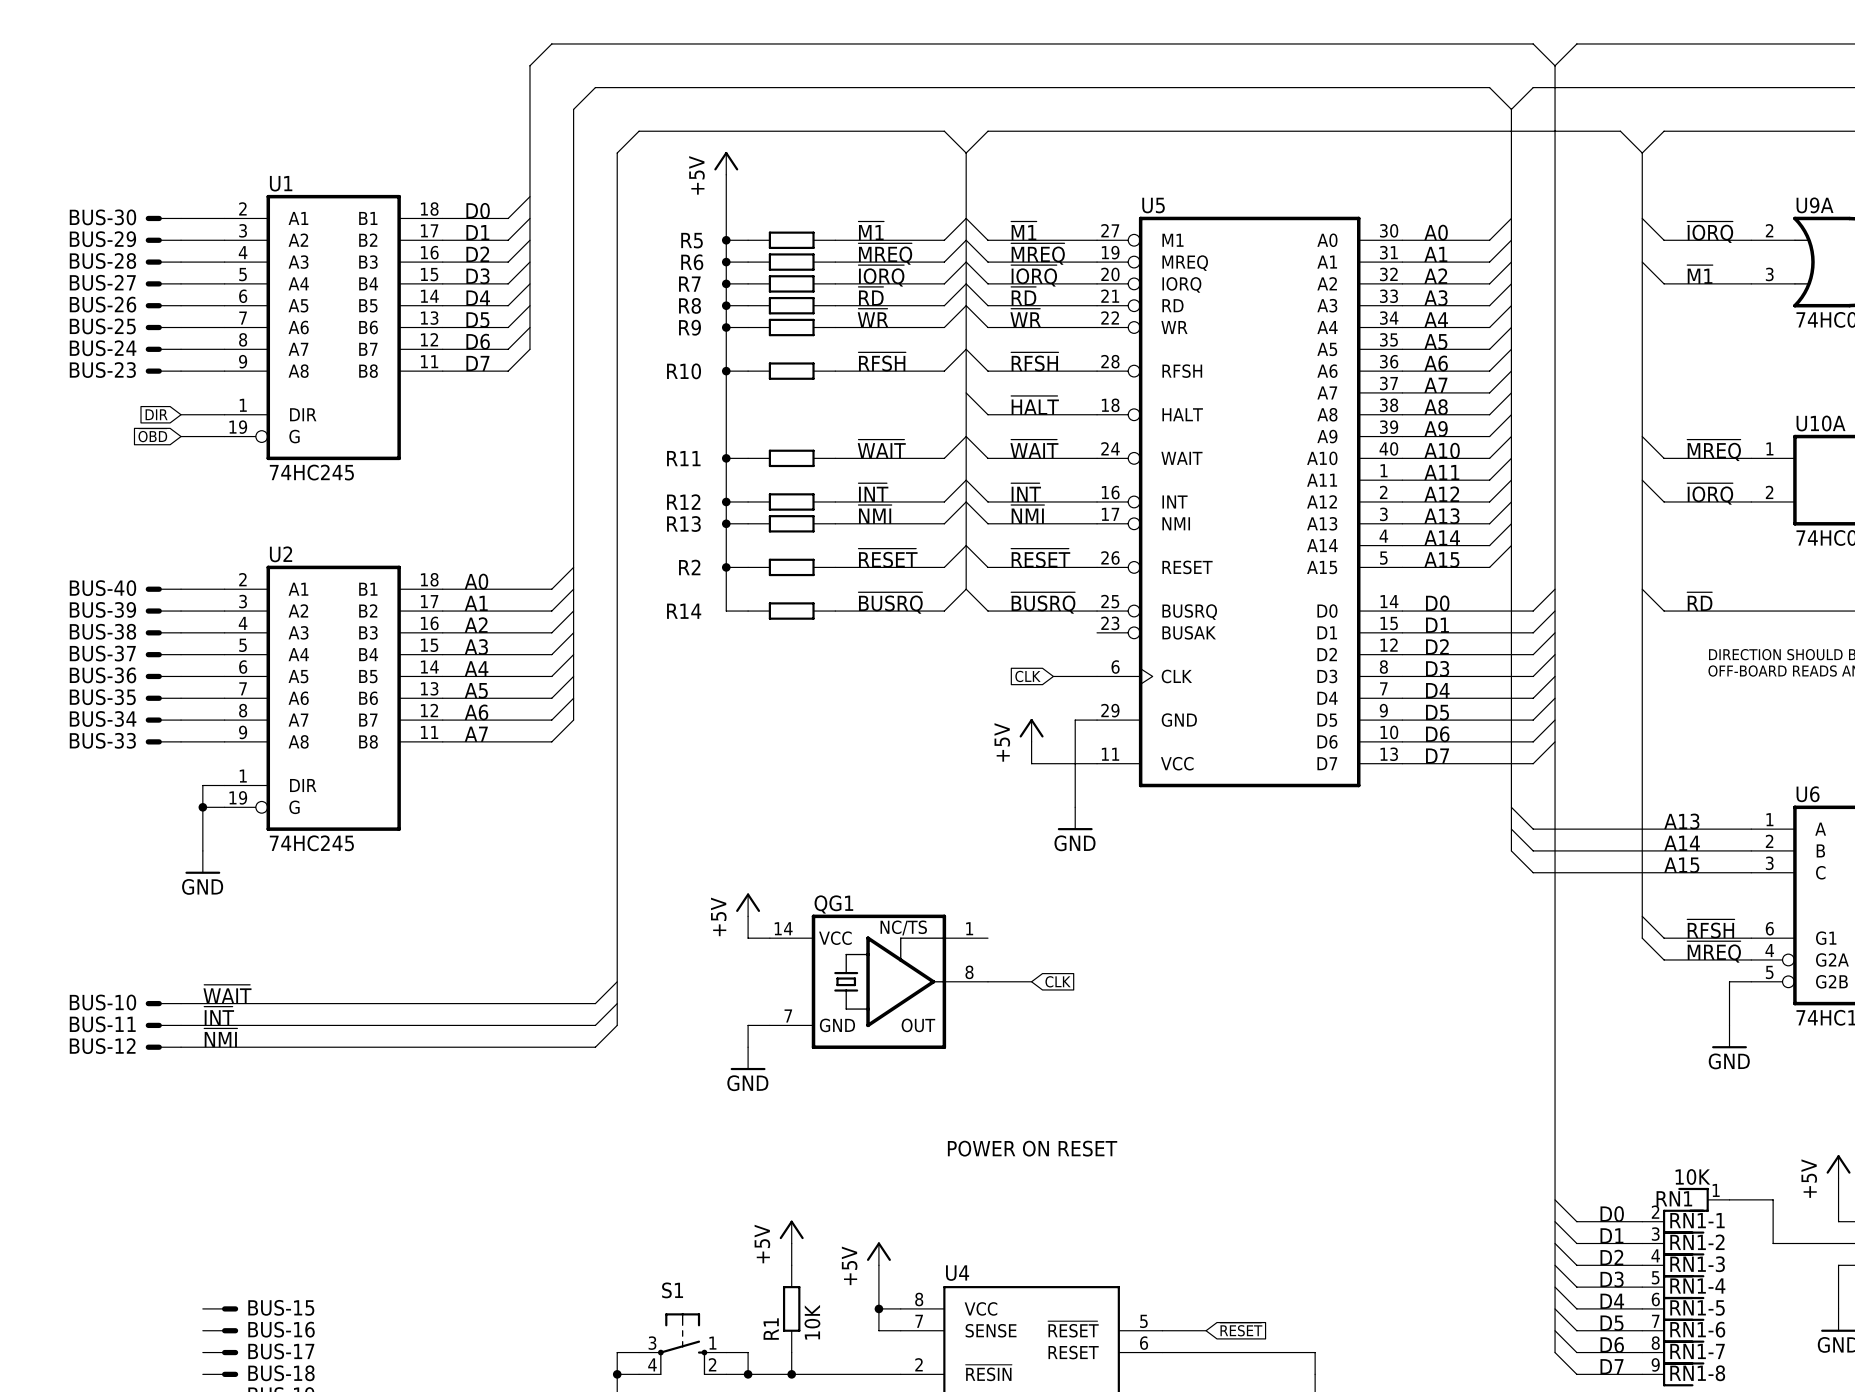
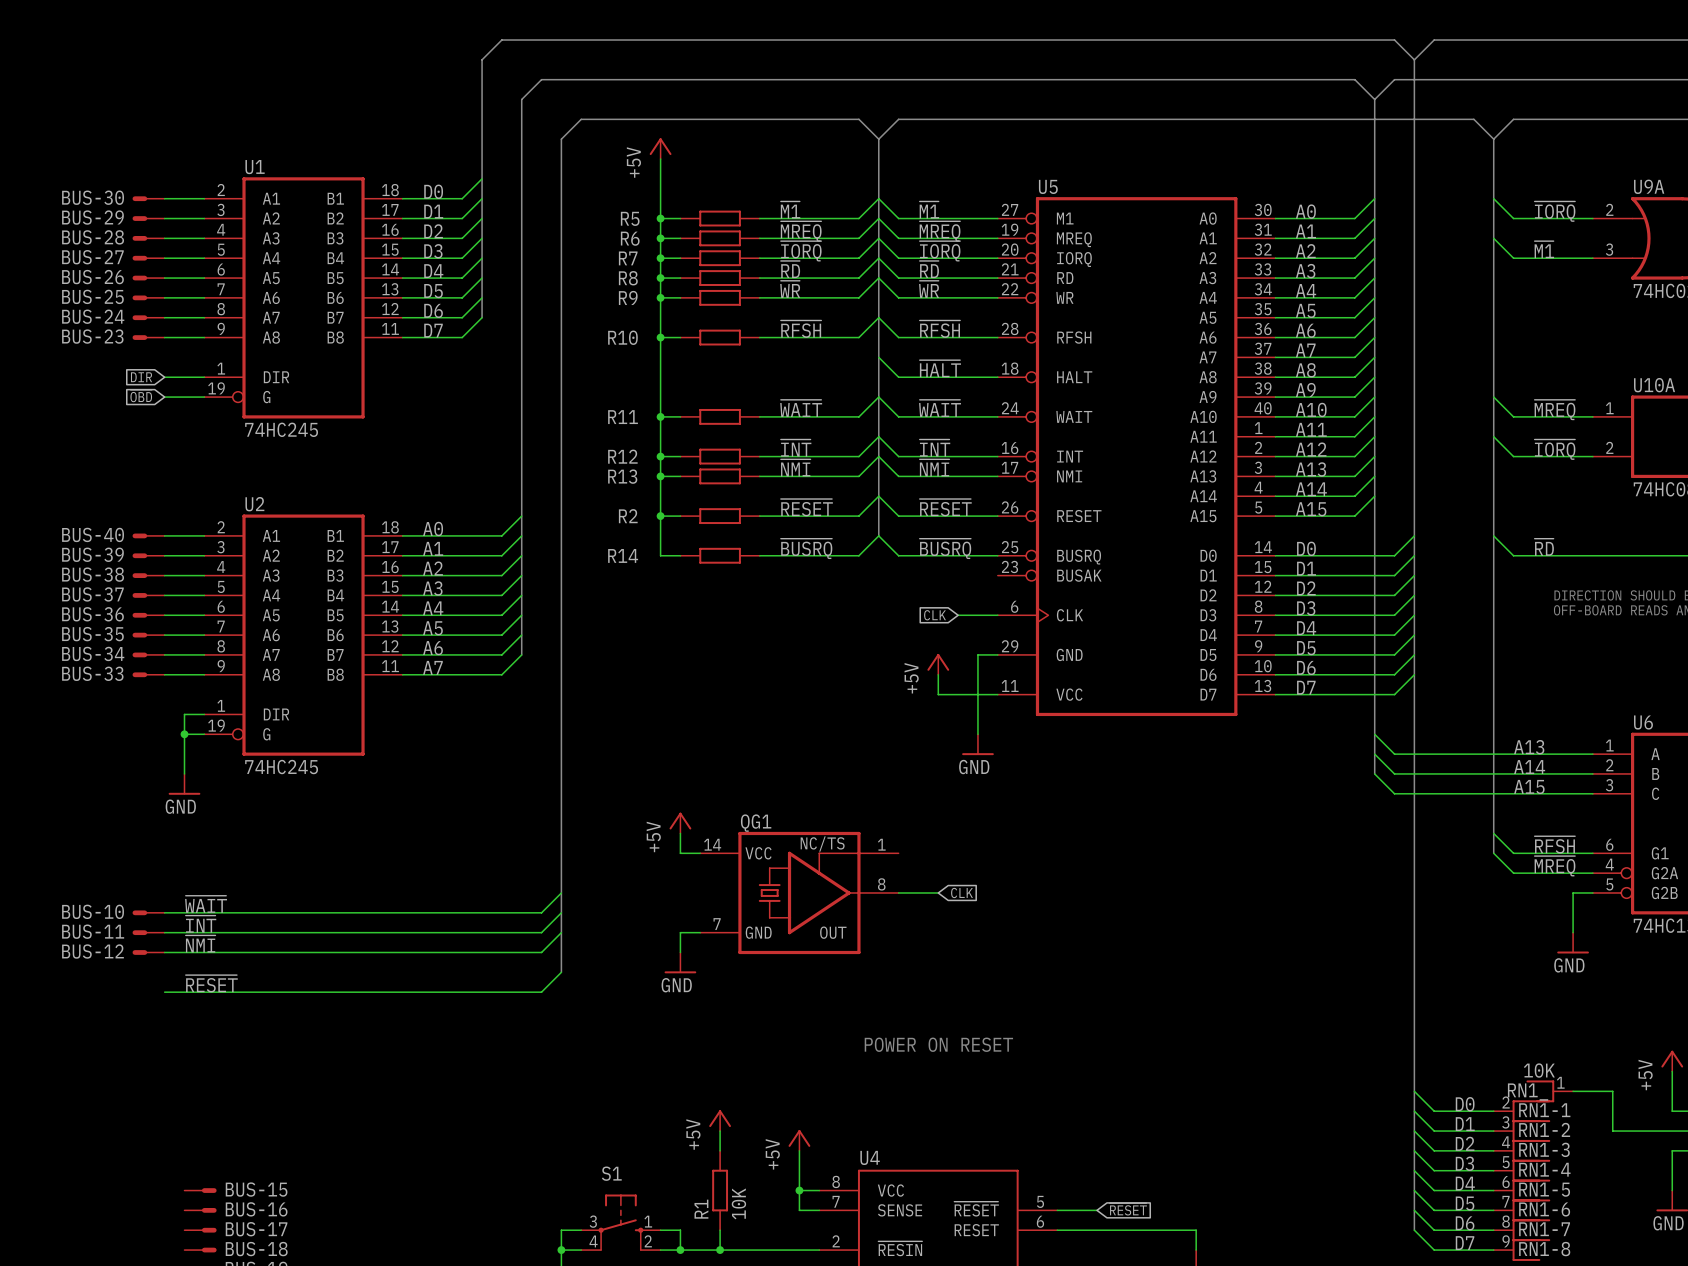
bus: none -> (561, 932) (561, 972)
wire: none -> (561, 972) (541, 992) (164, 992)
label: none -> ~{RESET} (211, 983)

